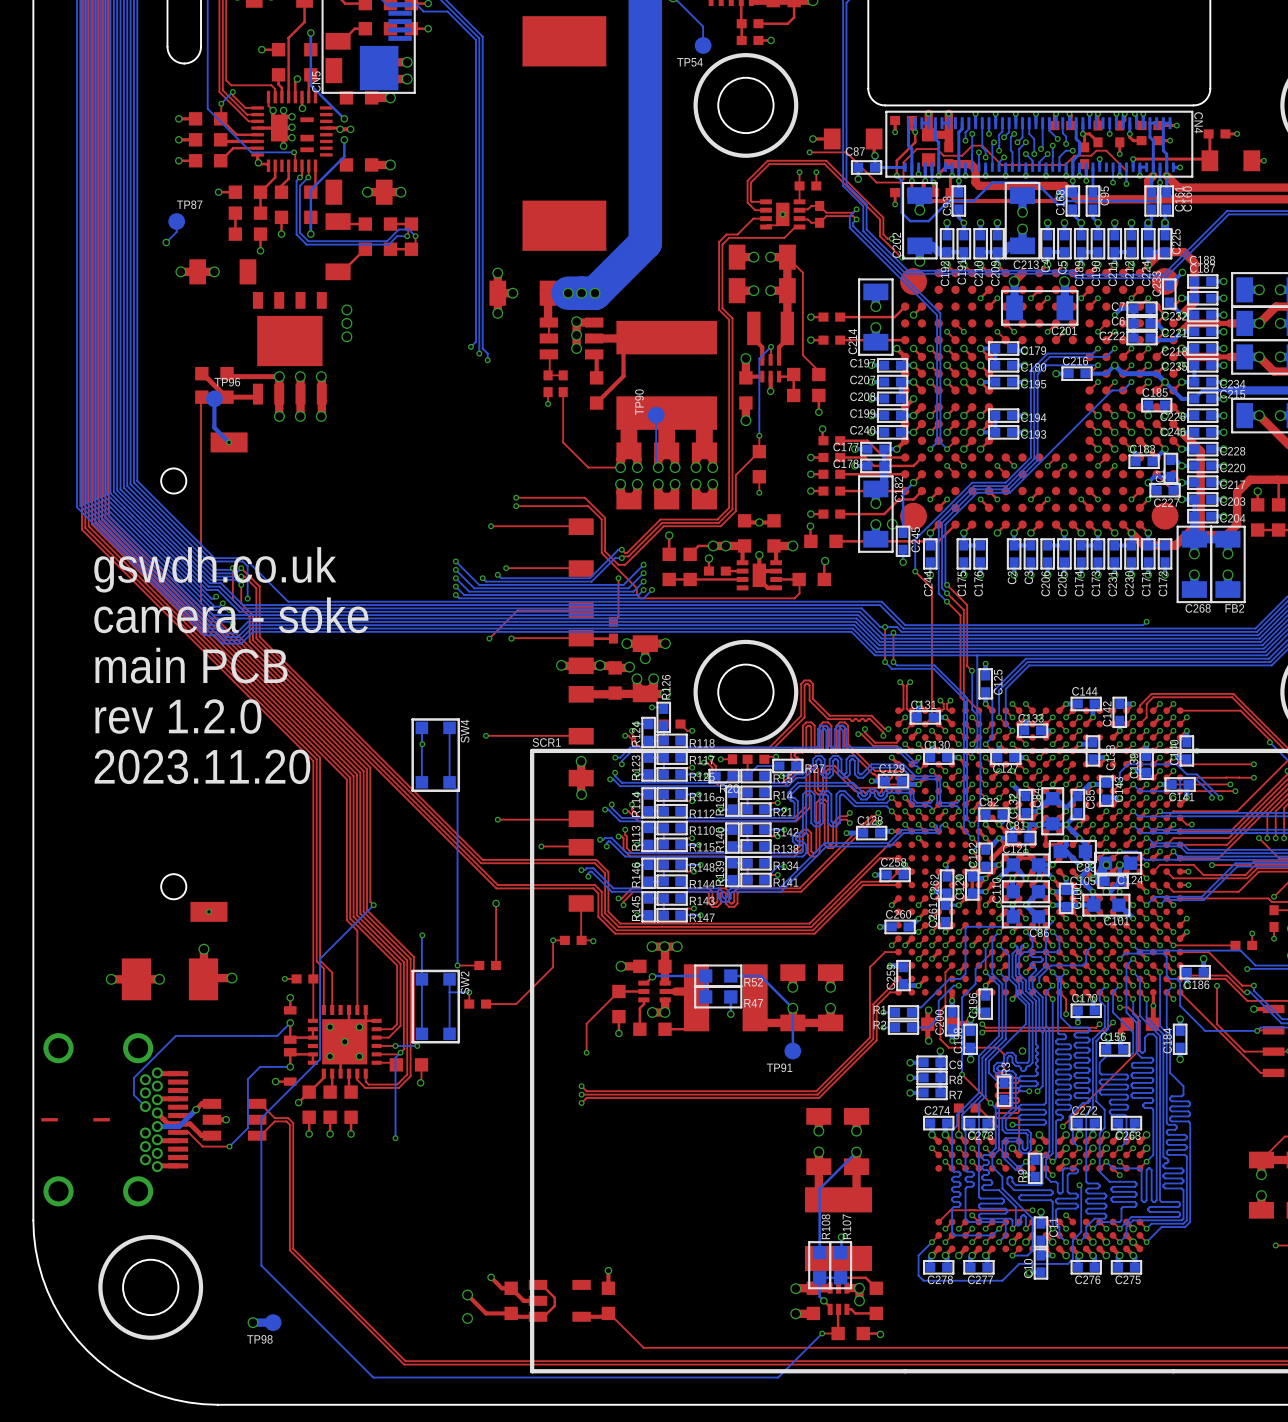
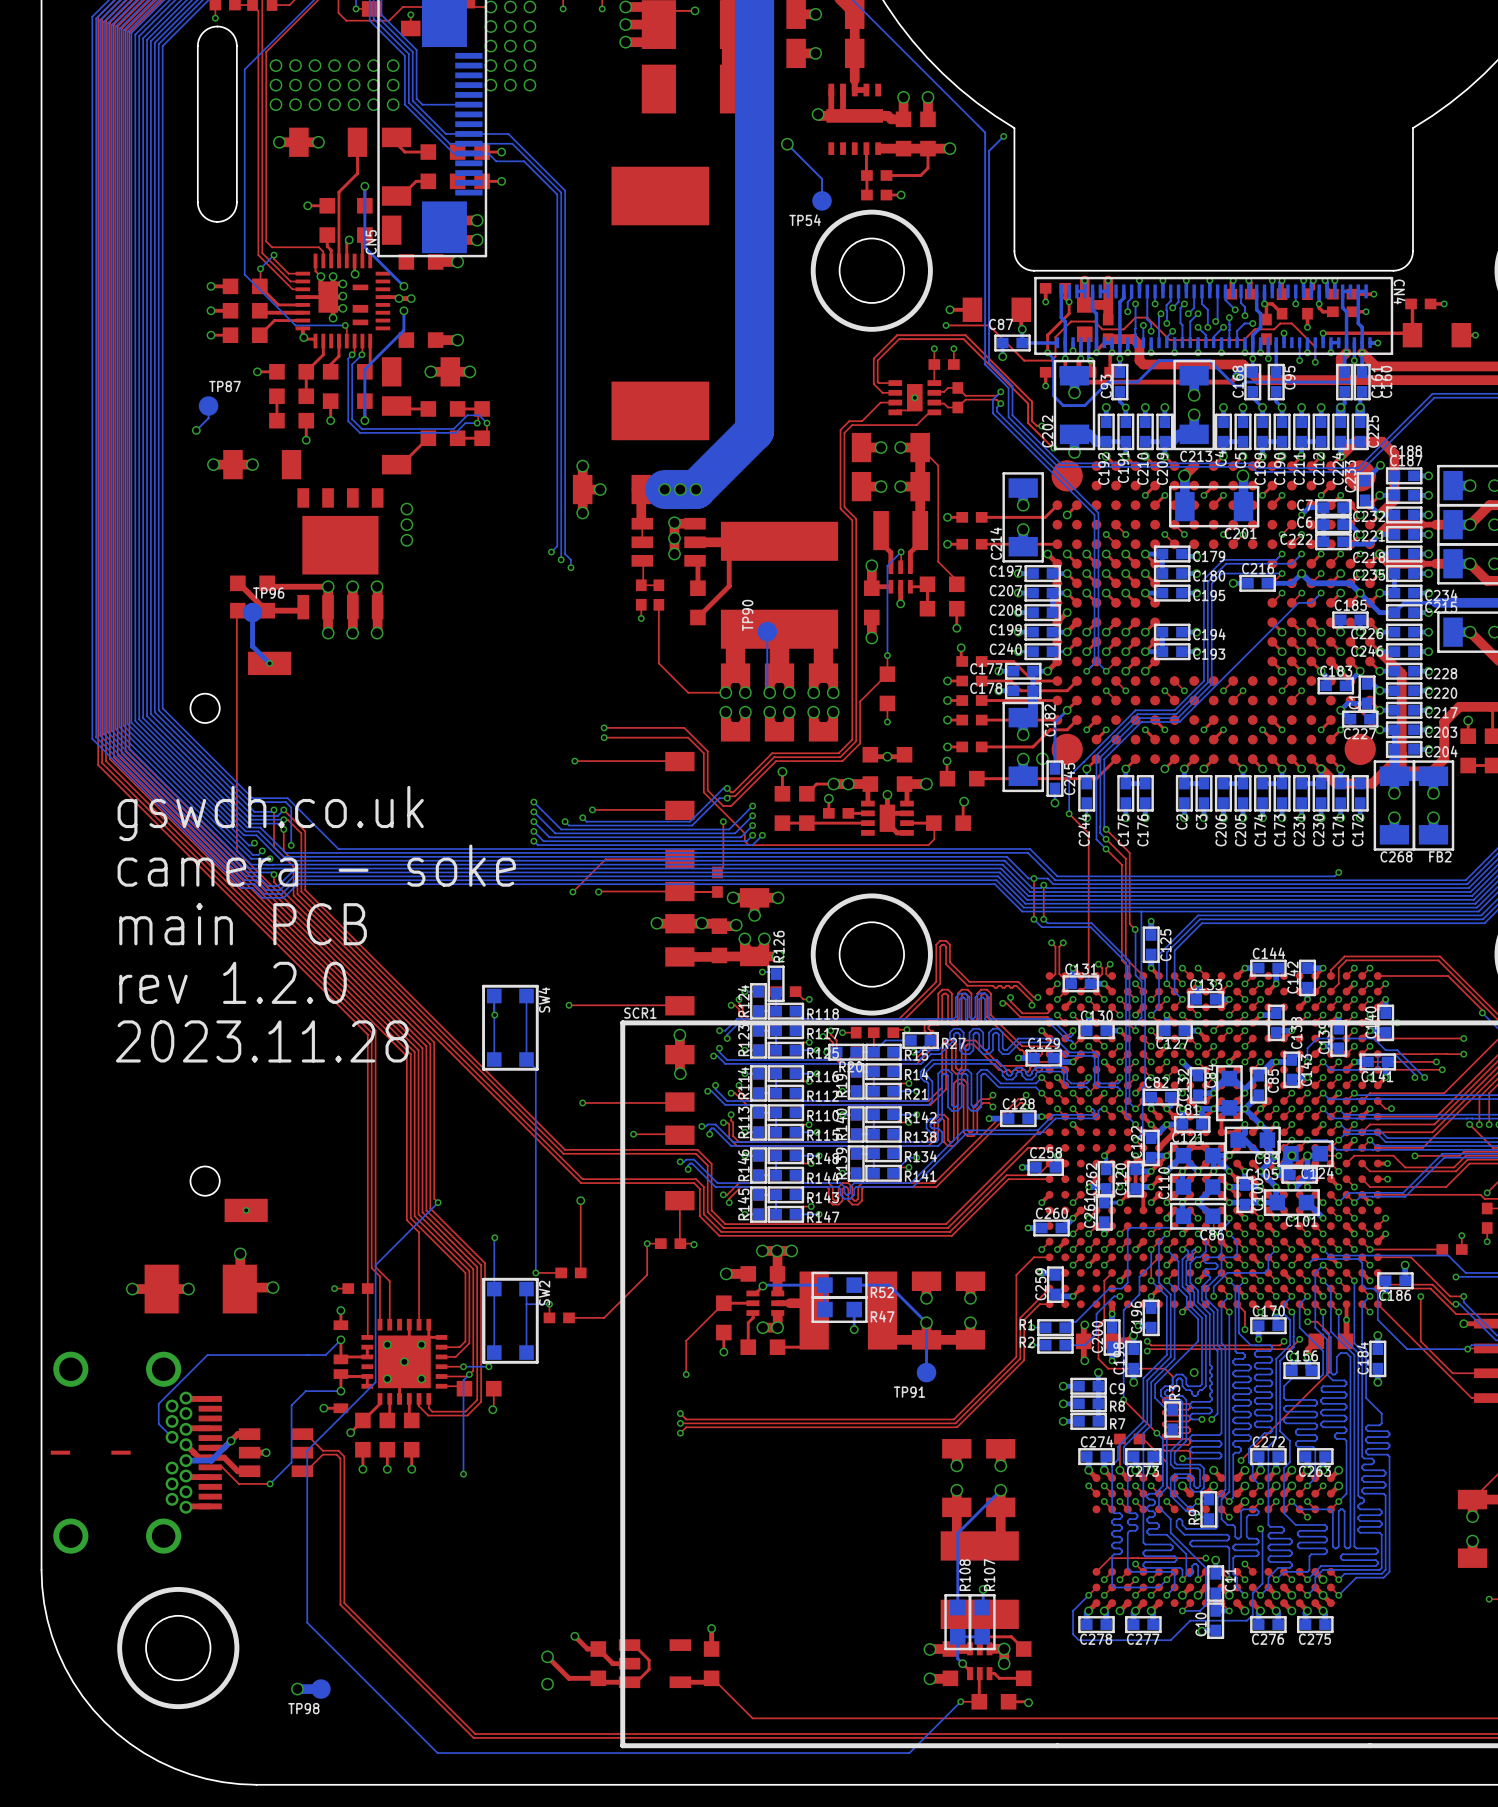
text: 2023.11.20 (202, 766) -> 2023.11.28 (262, 1041)

